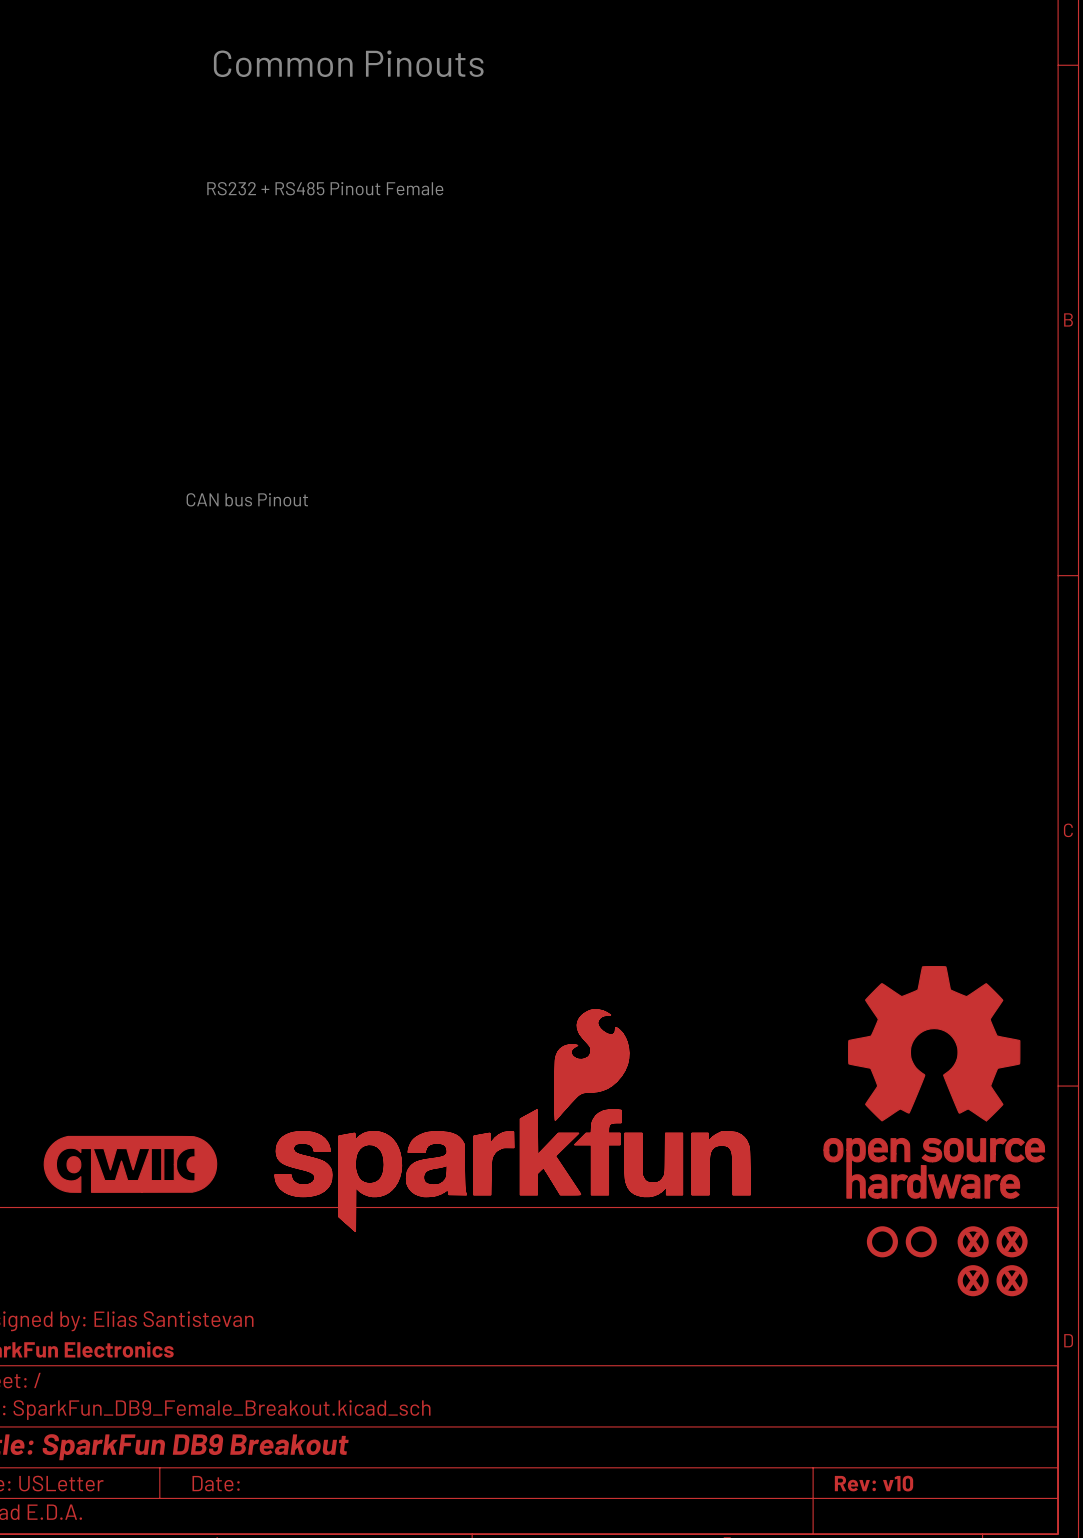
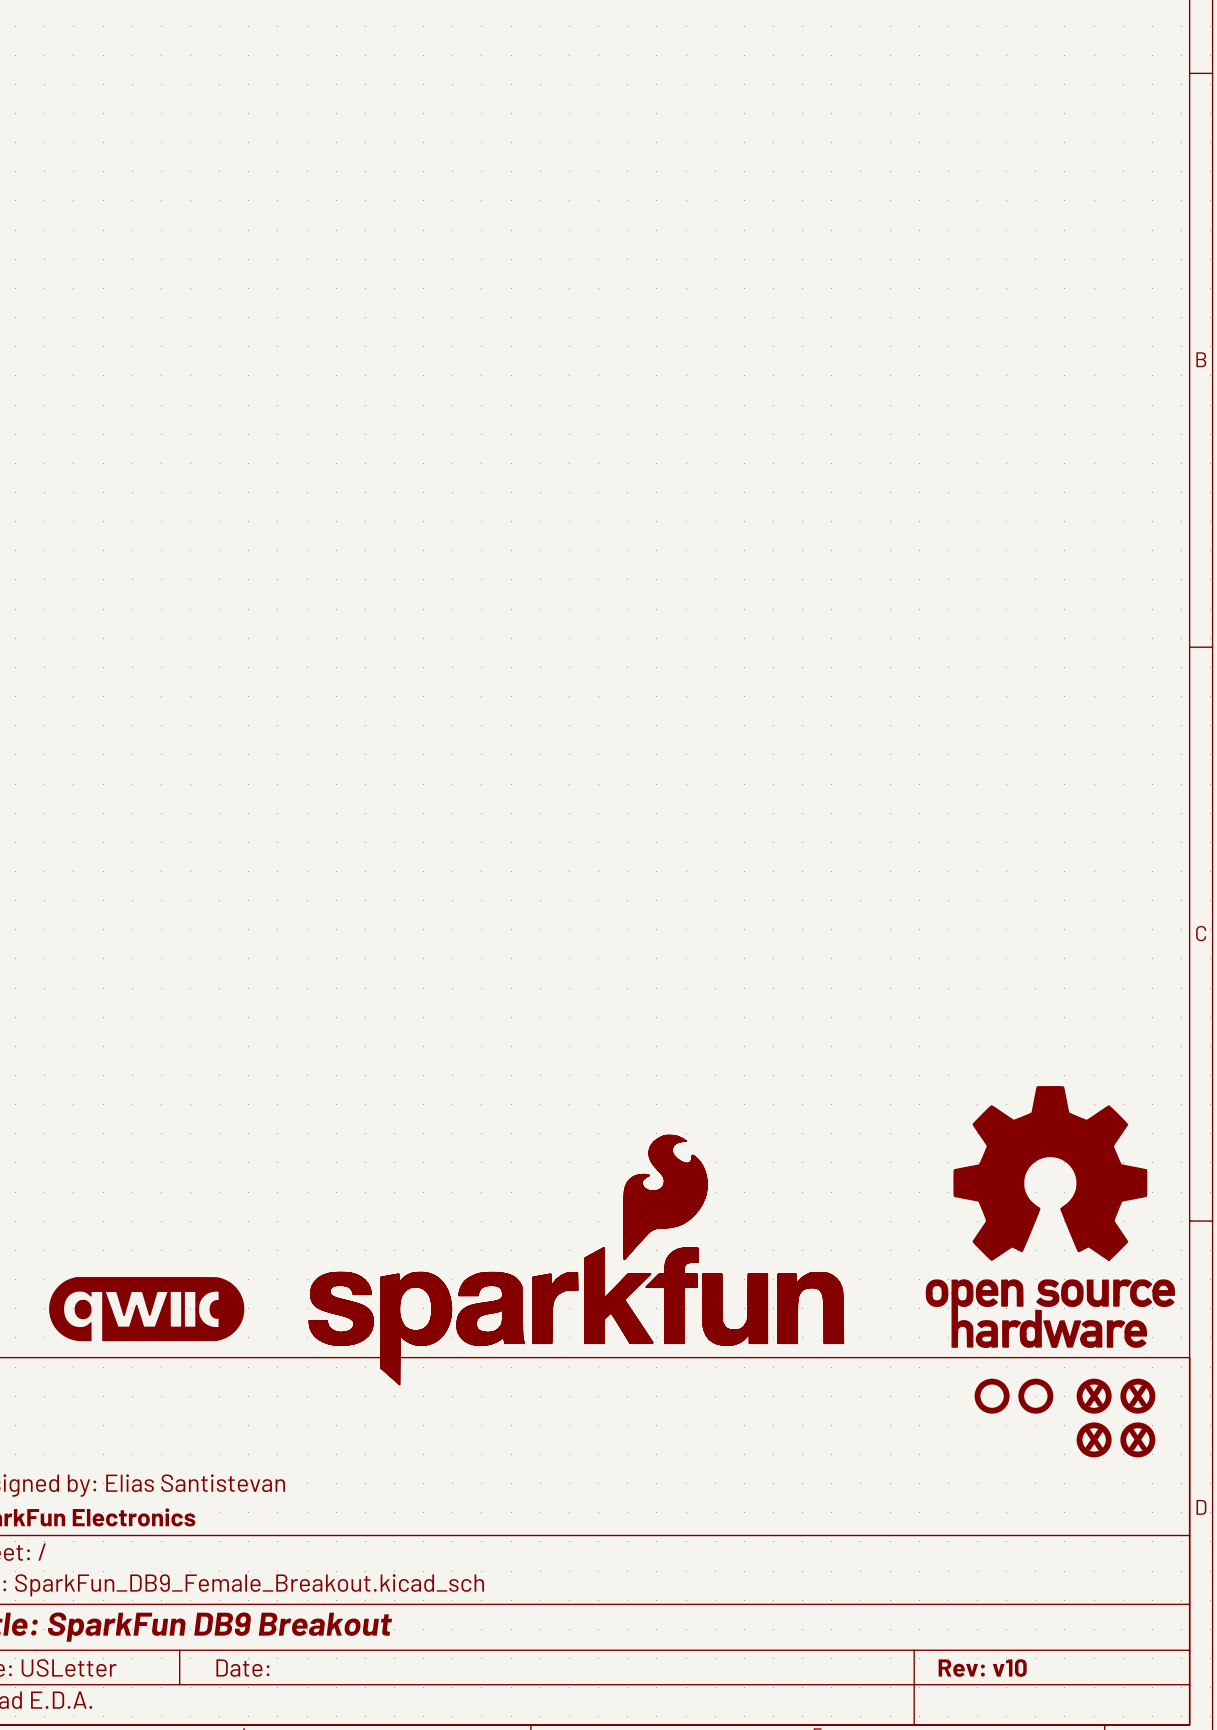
text: Common Pinouts (348, 63) -> none
text: RS232 + RS485 Pinout Female (325, 188) -> none
text: CAN bus Pinout (247, 499) -> none

